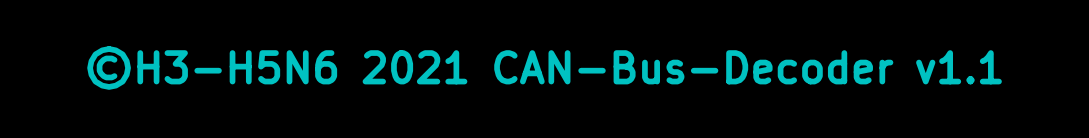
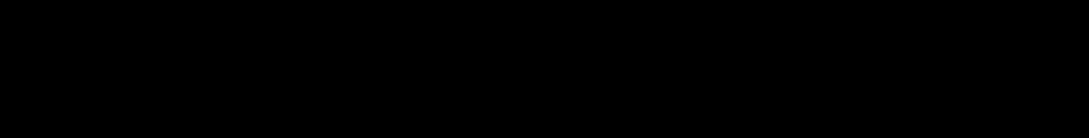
text: ©H3-H5N6 2021 CAN-Bus-Decoder v1.1 (544, 67) -> none

